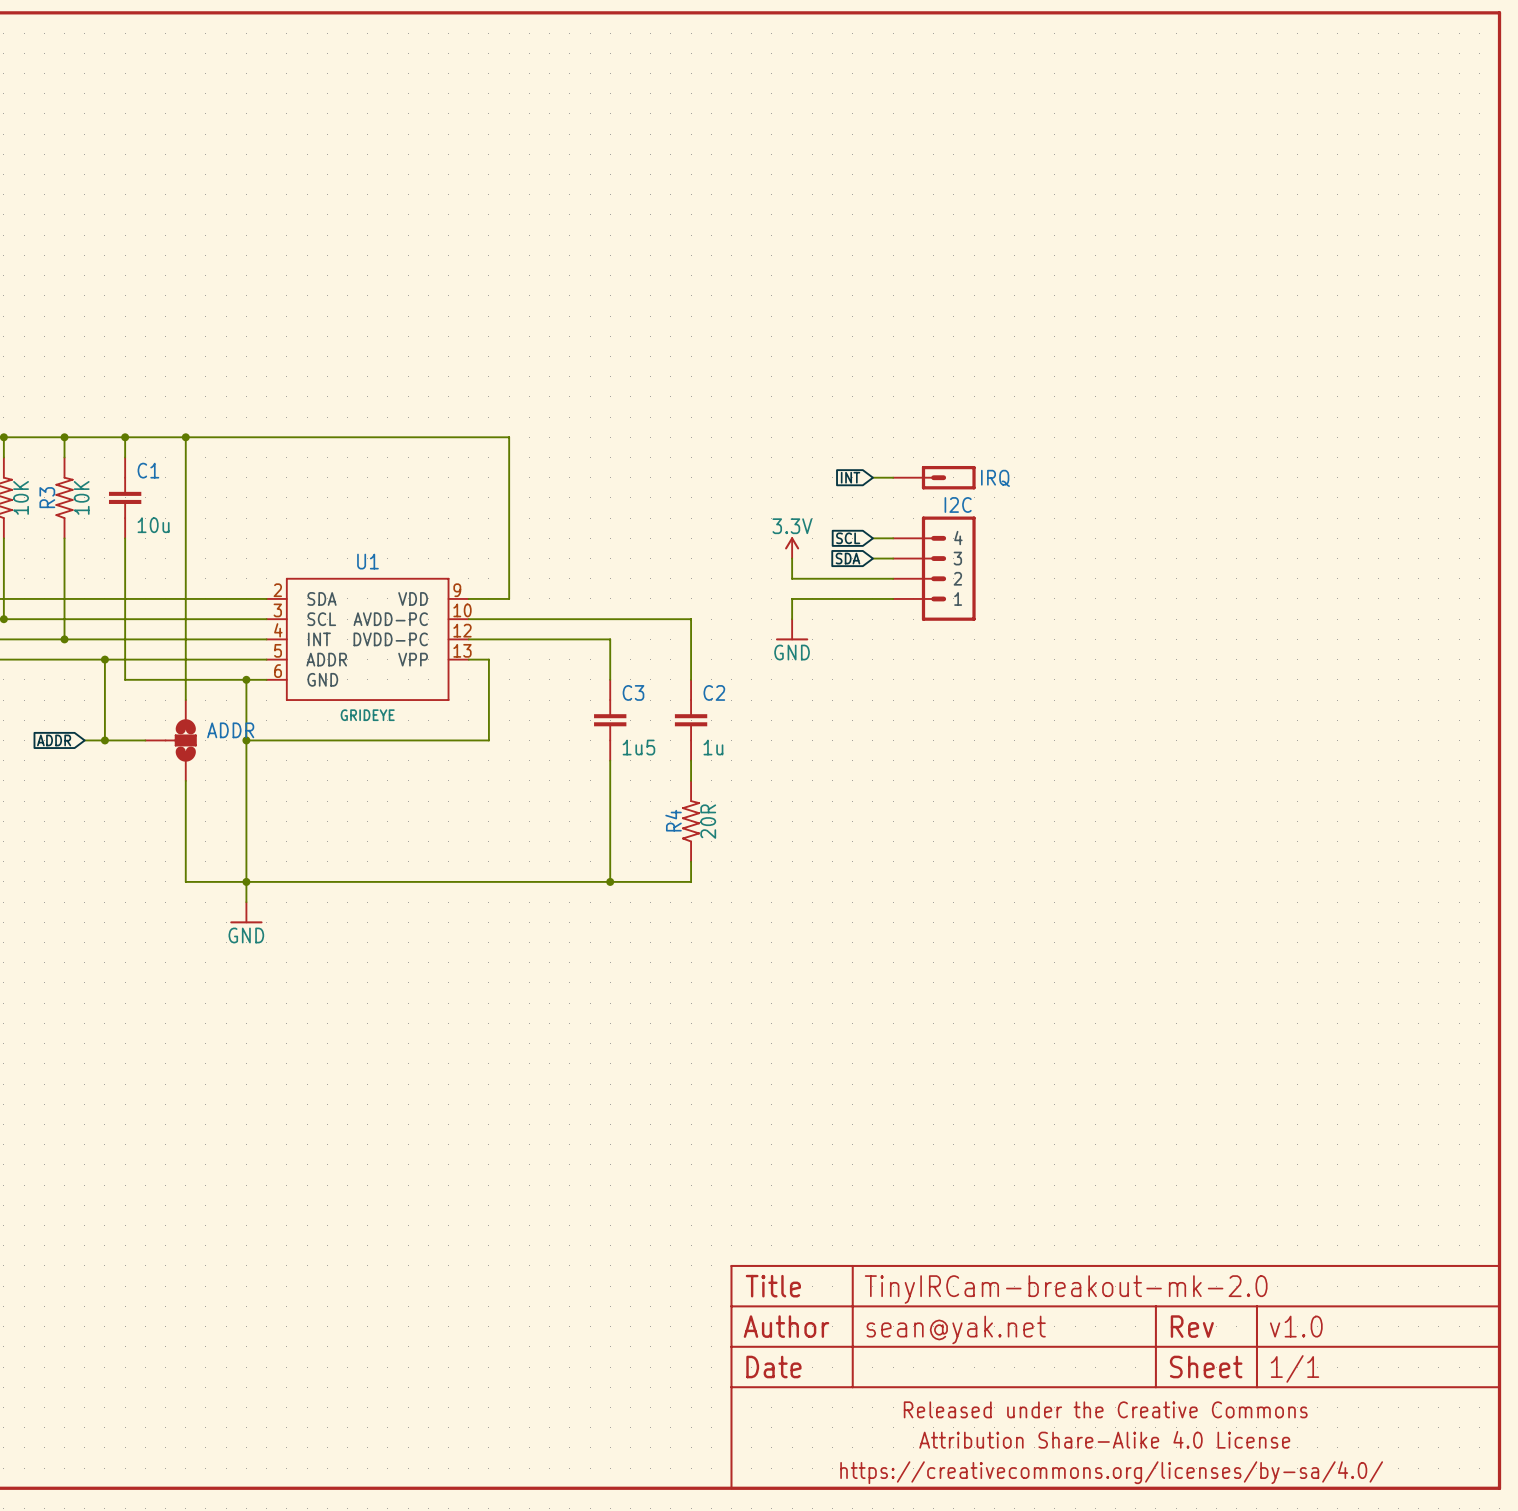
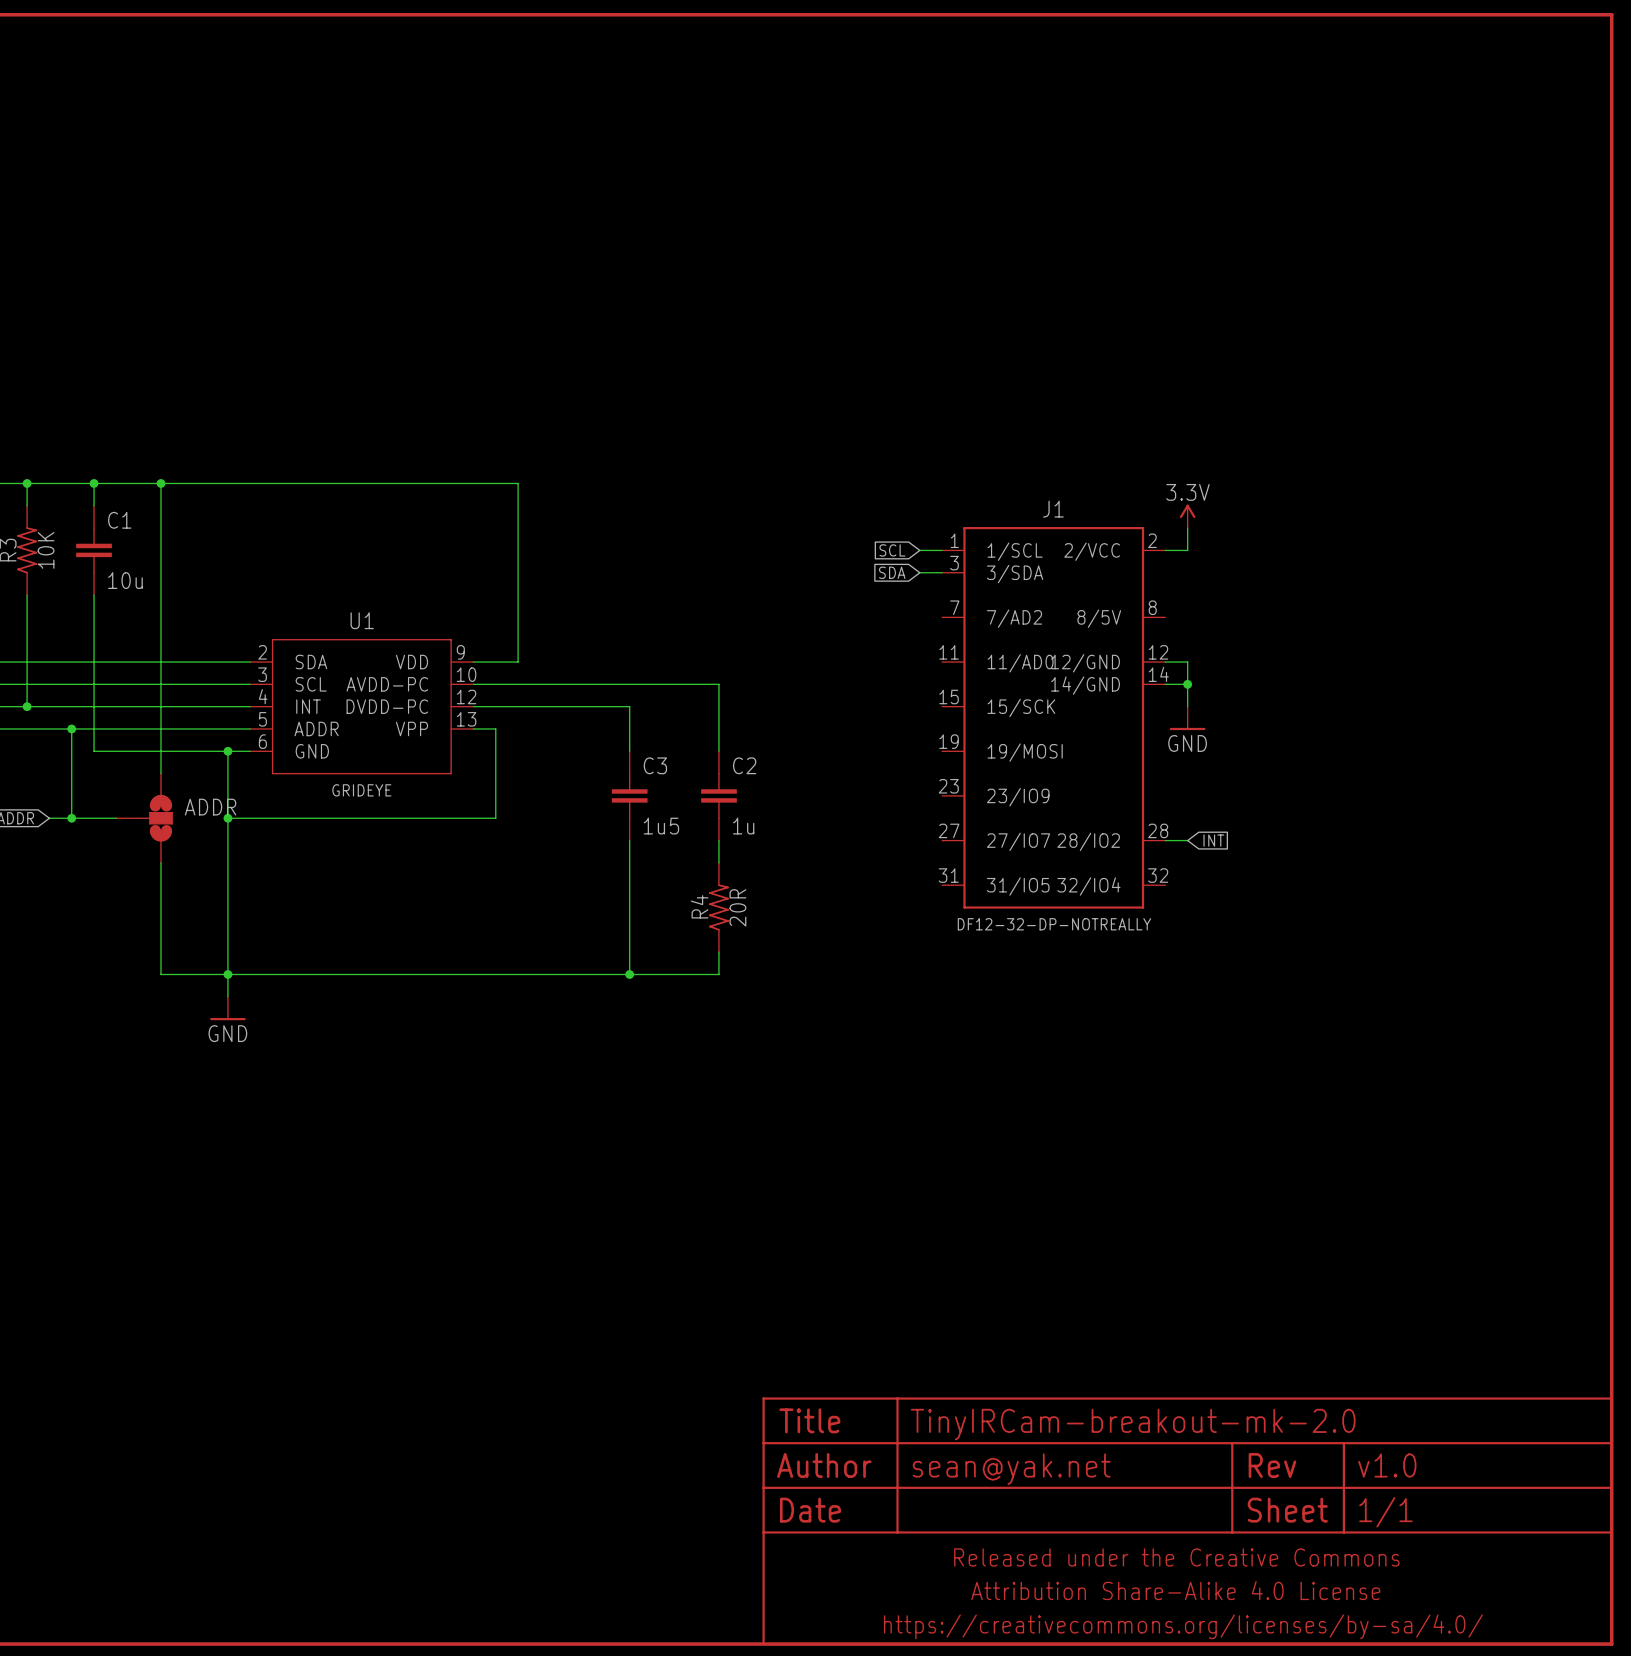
power symbol: none -> 3.3V (1187, 516)
global label: INT (850, 477) -> none
wire: (872, 477) (893, 477) -> none
IRQ: (934, 477) -> none
wire: none -> (1187, 528) (1187, 550) (1165, 550)
global label position: SCL (848, 538) -> SCL (892, 550)
wire: (872, 538) (893, 538) -> (919, 550) (942, 550)
power symbol: 3.3V (792, 547) -> none
wire: (792, 558) (792, 578) (893, 578) -> none
global label position: SDA (847, 558) -> SDA (892, 572)
wire: (872, 558) (893, 558) -> (919, 572) (942, 572)
I2C: (934, 568) -> none
wire: (893, 598) (792, 598) (792, 619) -> none
wire: none -> (1165, 662) (1187, 662) (1187, 706)
wire: none -> (1165, 684) (1187, 684)
junction: none -> (1187, 684)
power symbol: GND (792, 629) -> none
J1: none -> DF12-32-DP-NOTREALLY (1053, 717)
power symbol: none -> GND (1187, 718)
wire: none -> (1165, 840) (1187, 840)
global label: none -> INT (1213, 840)

